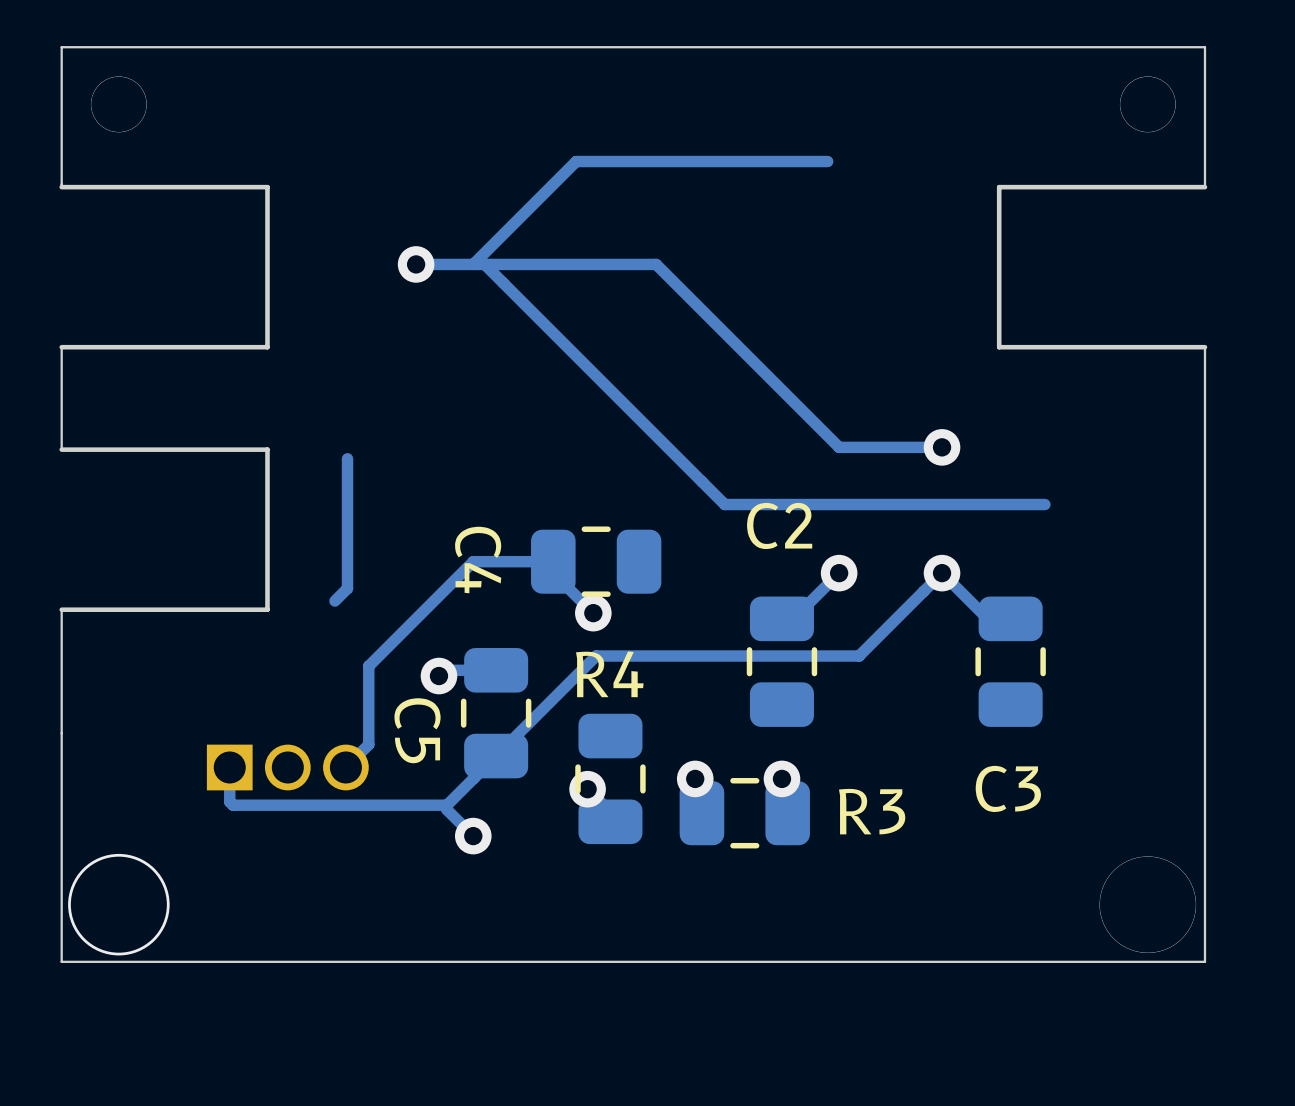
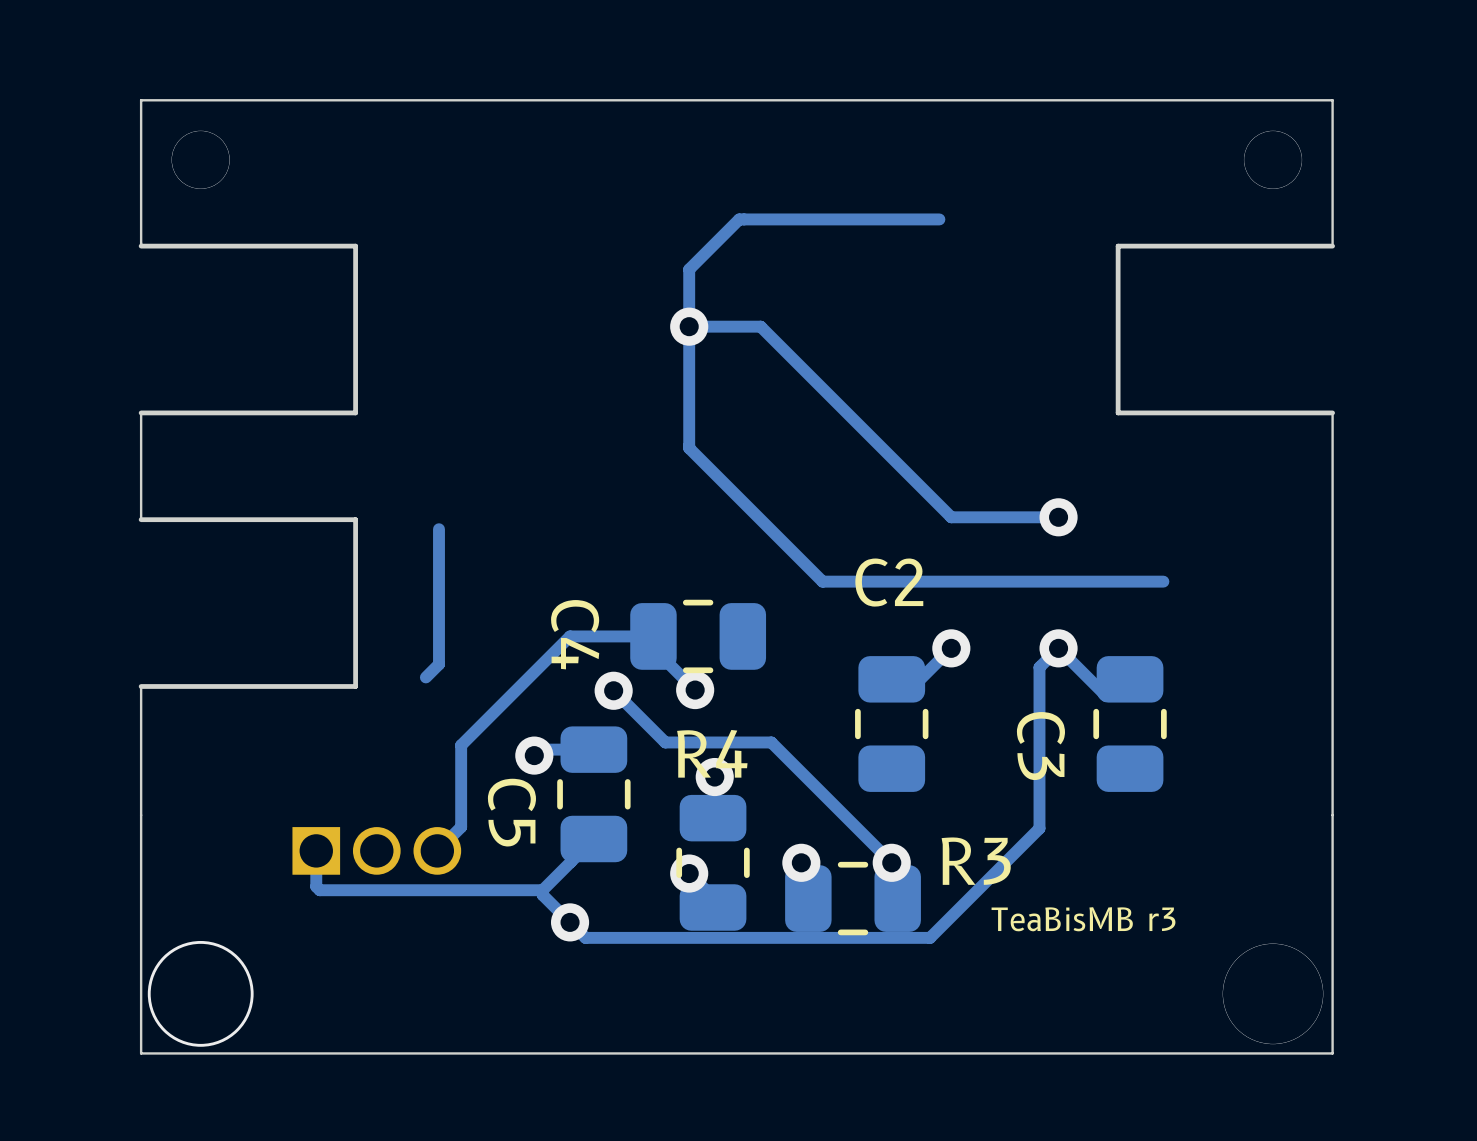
track: (635, 161) (576, 161) (473, 264) -> (739, 219) (689, 269) (689, 448) (822, 581) (1163, 581)
via position: (416, 264) -> (689, 326)
track: (484, 264) (724, 504) (1044, 504) -> none
track: (587, 264) (416, 264) -> none
track: (923, 591) (859, 656) (596, 656) (496, 756) -> (1039, 667) (1039, 828) (930, 937) (585, 937) (570, 922)
track: none -> (613, 690) (665, 742) (771, 742) (891, 862)
via: none -> (613, 690)
C2 position: (781, 661) -> (891, 724)
C3 position: (1010, 661) -> (1130, 724)
via: none -> (714, 777)
C3 name rotation: 0° (1008, 788) -> 90° clockwise (1040, 746)
C3 name position: C3 (1008, 788) -> C3 (1040, 746)
R3 name position: R3 (872, 811) -> R3 (976, 861)
text: none -> TeaBisMB r3 (1083, 919)

